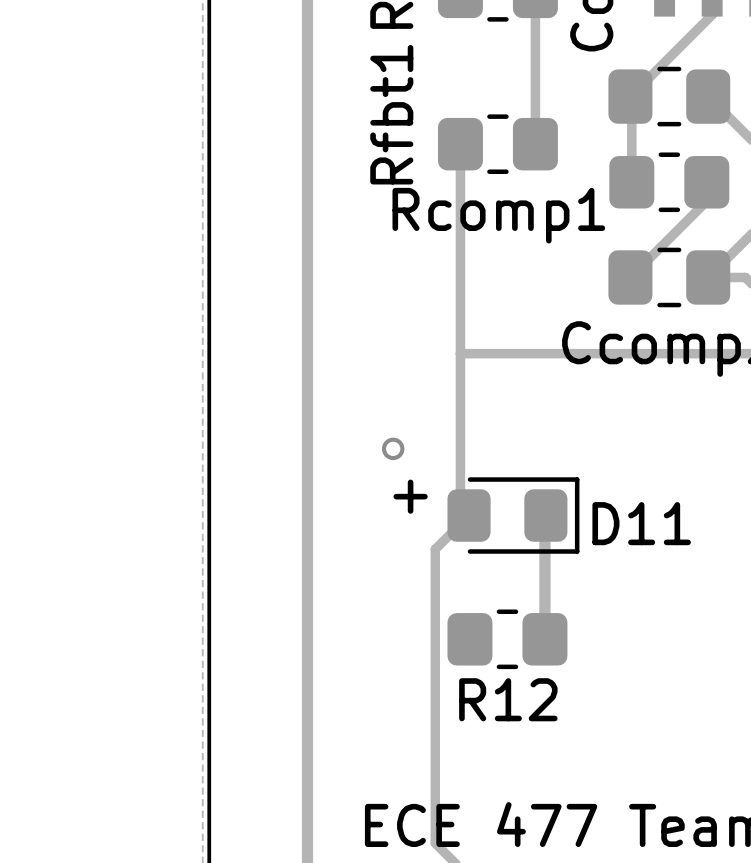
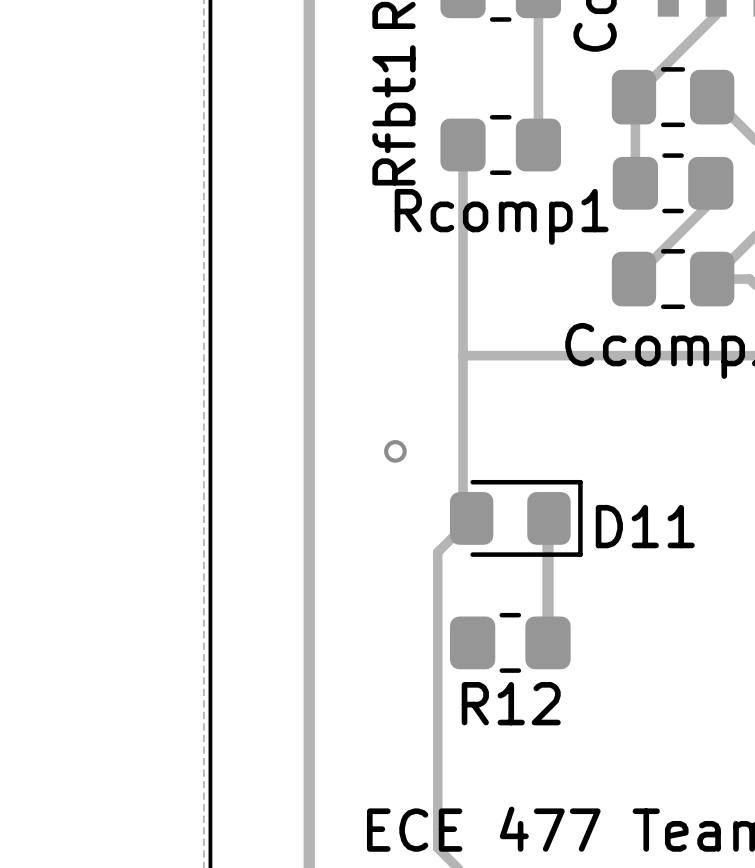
text: + (410, 496) -> none

